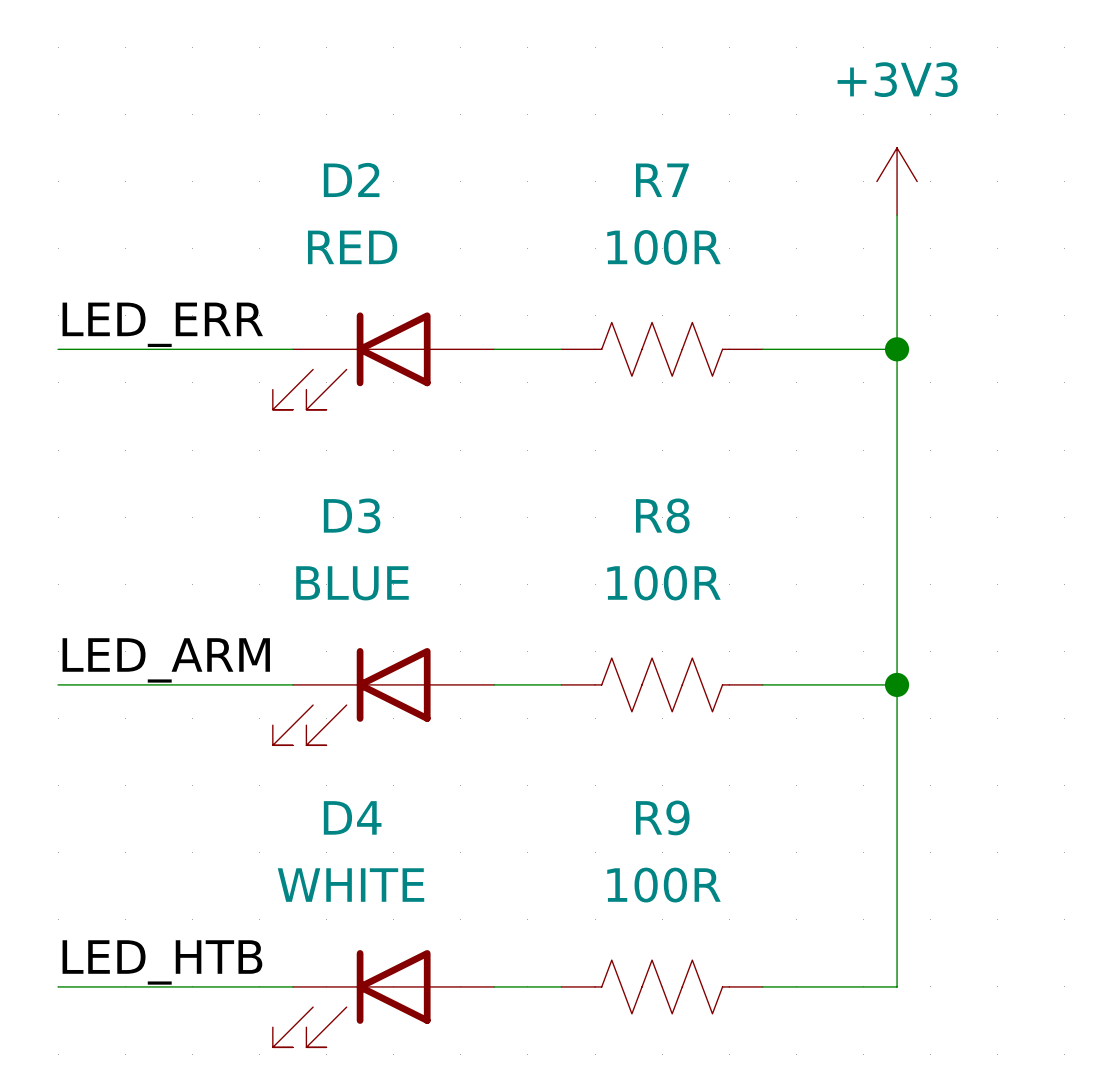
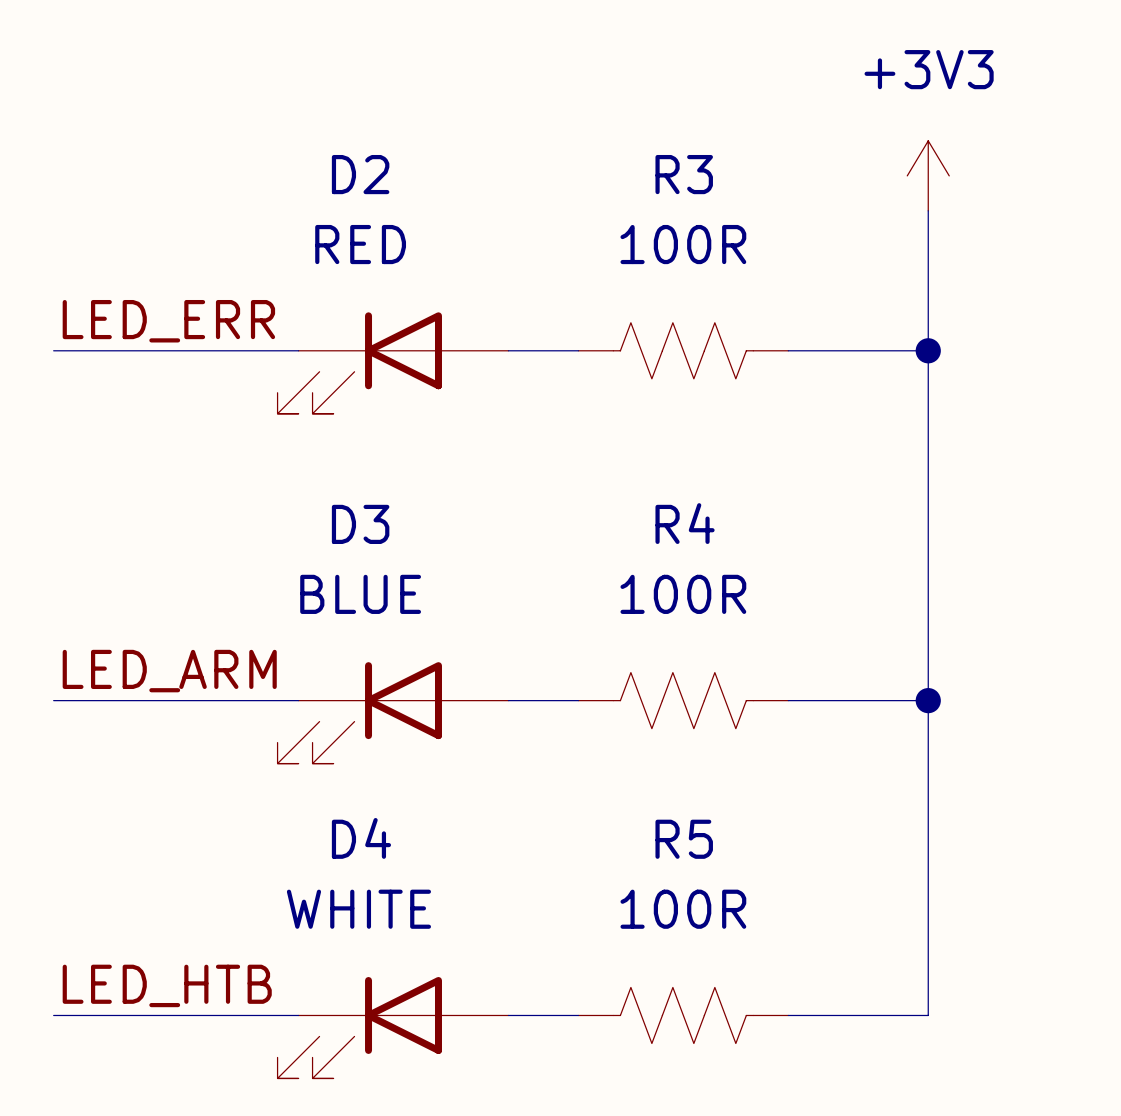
R7 name: R7 (662, 180) -> R3 (684, 174)
R8 name: R8 (662, 515) -> R4 (685, 523)
R9 name: R9 (662, 817) -> R5 (684, 839)

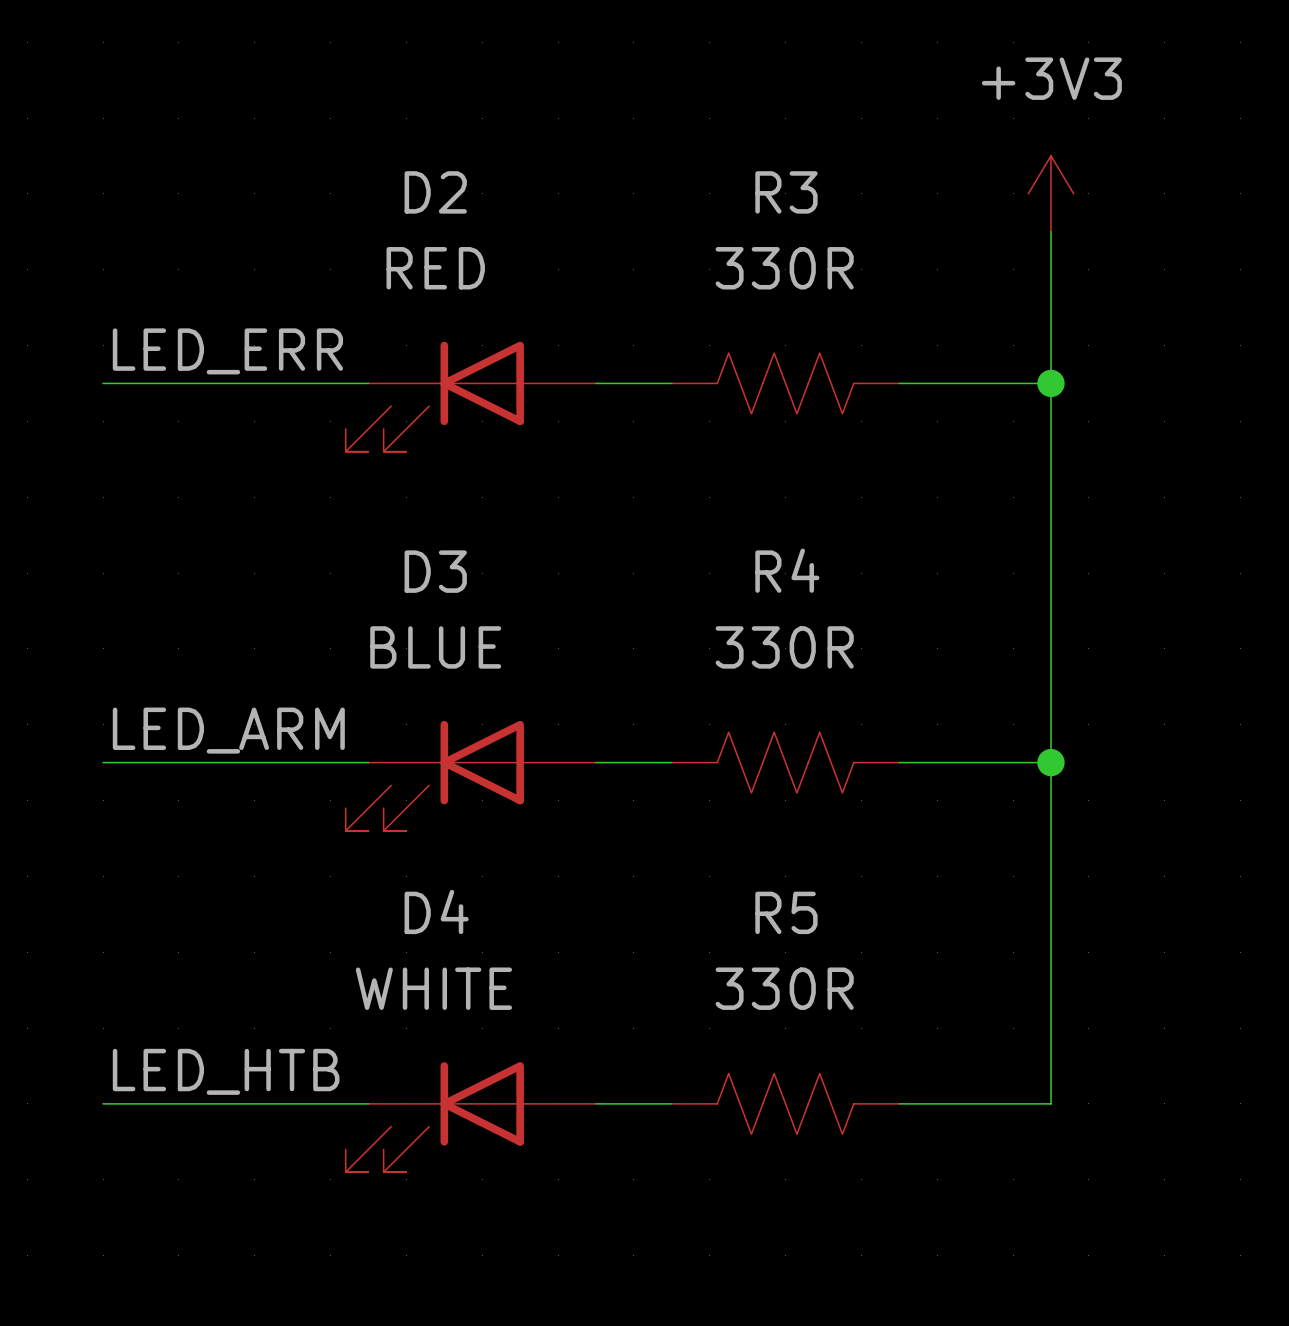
R3 value: 100R (683, 244) -> 330R (784, 268)
R4 value: 100R (683, 594) -> 330R (784, 647)
R5 value: 100R (683, 909) -> 330R (784, 988)

